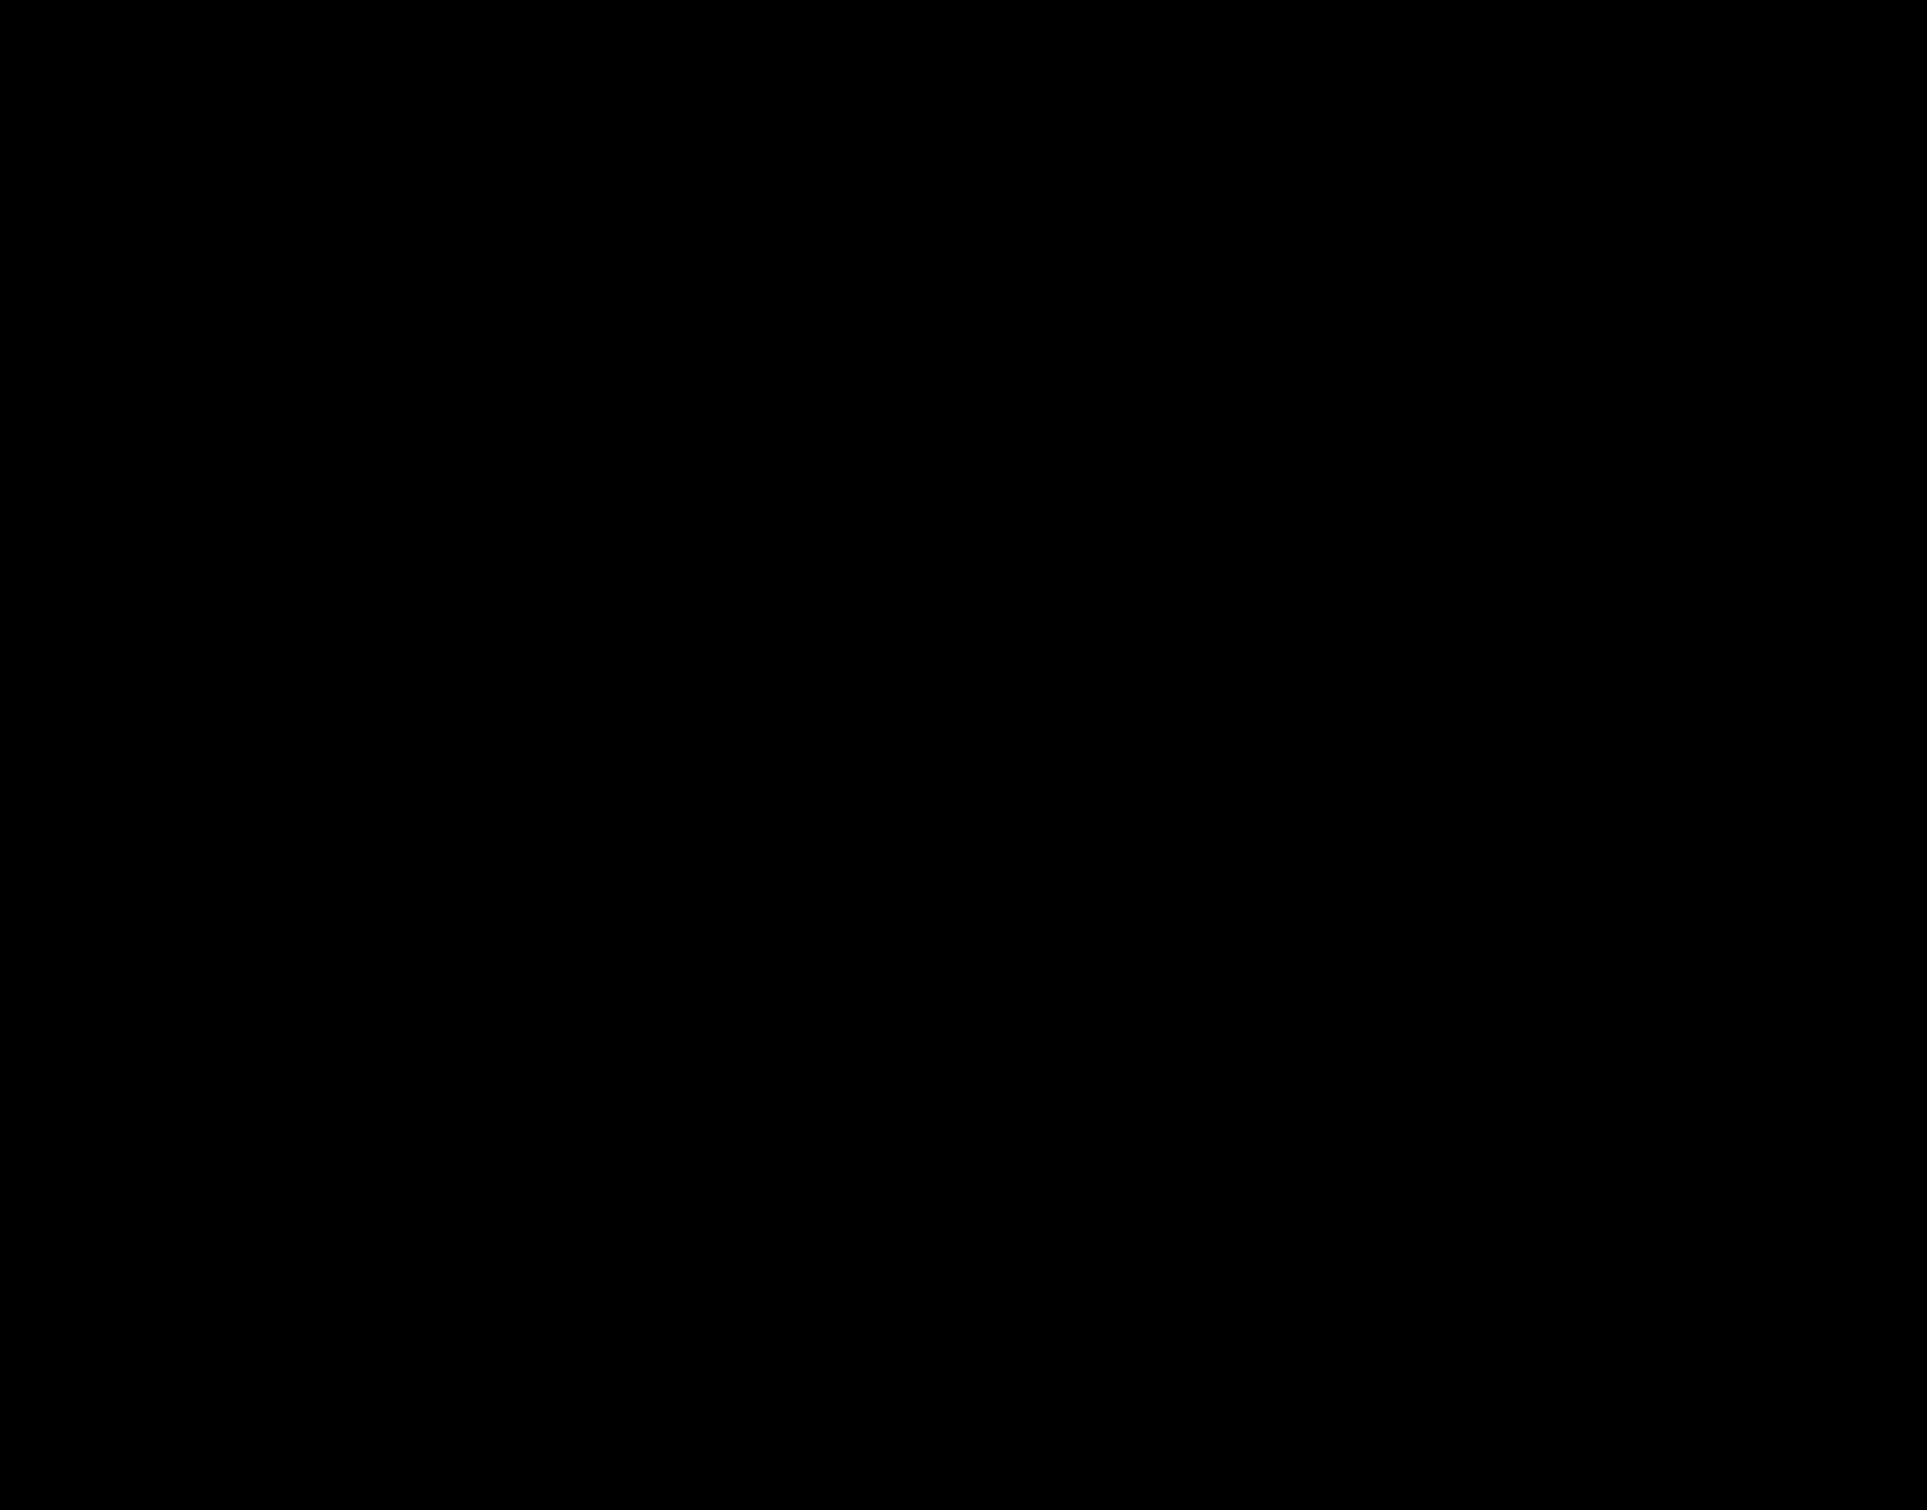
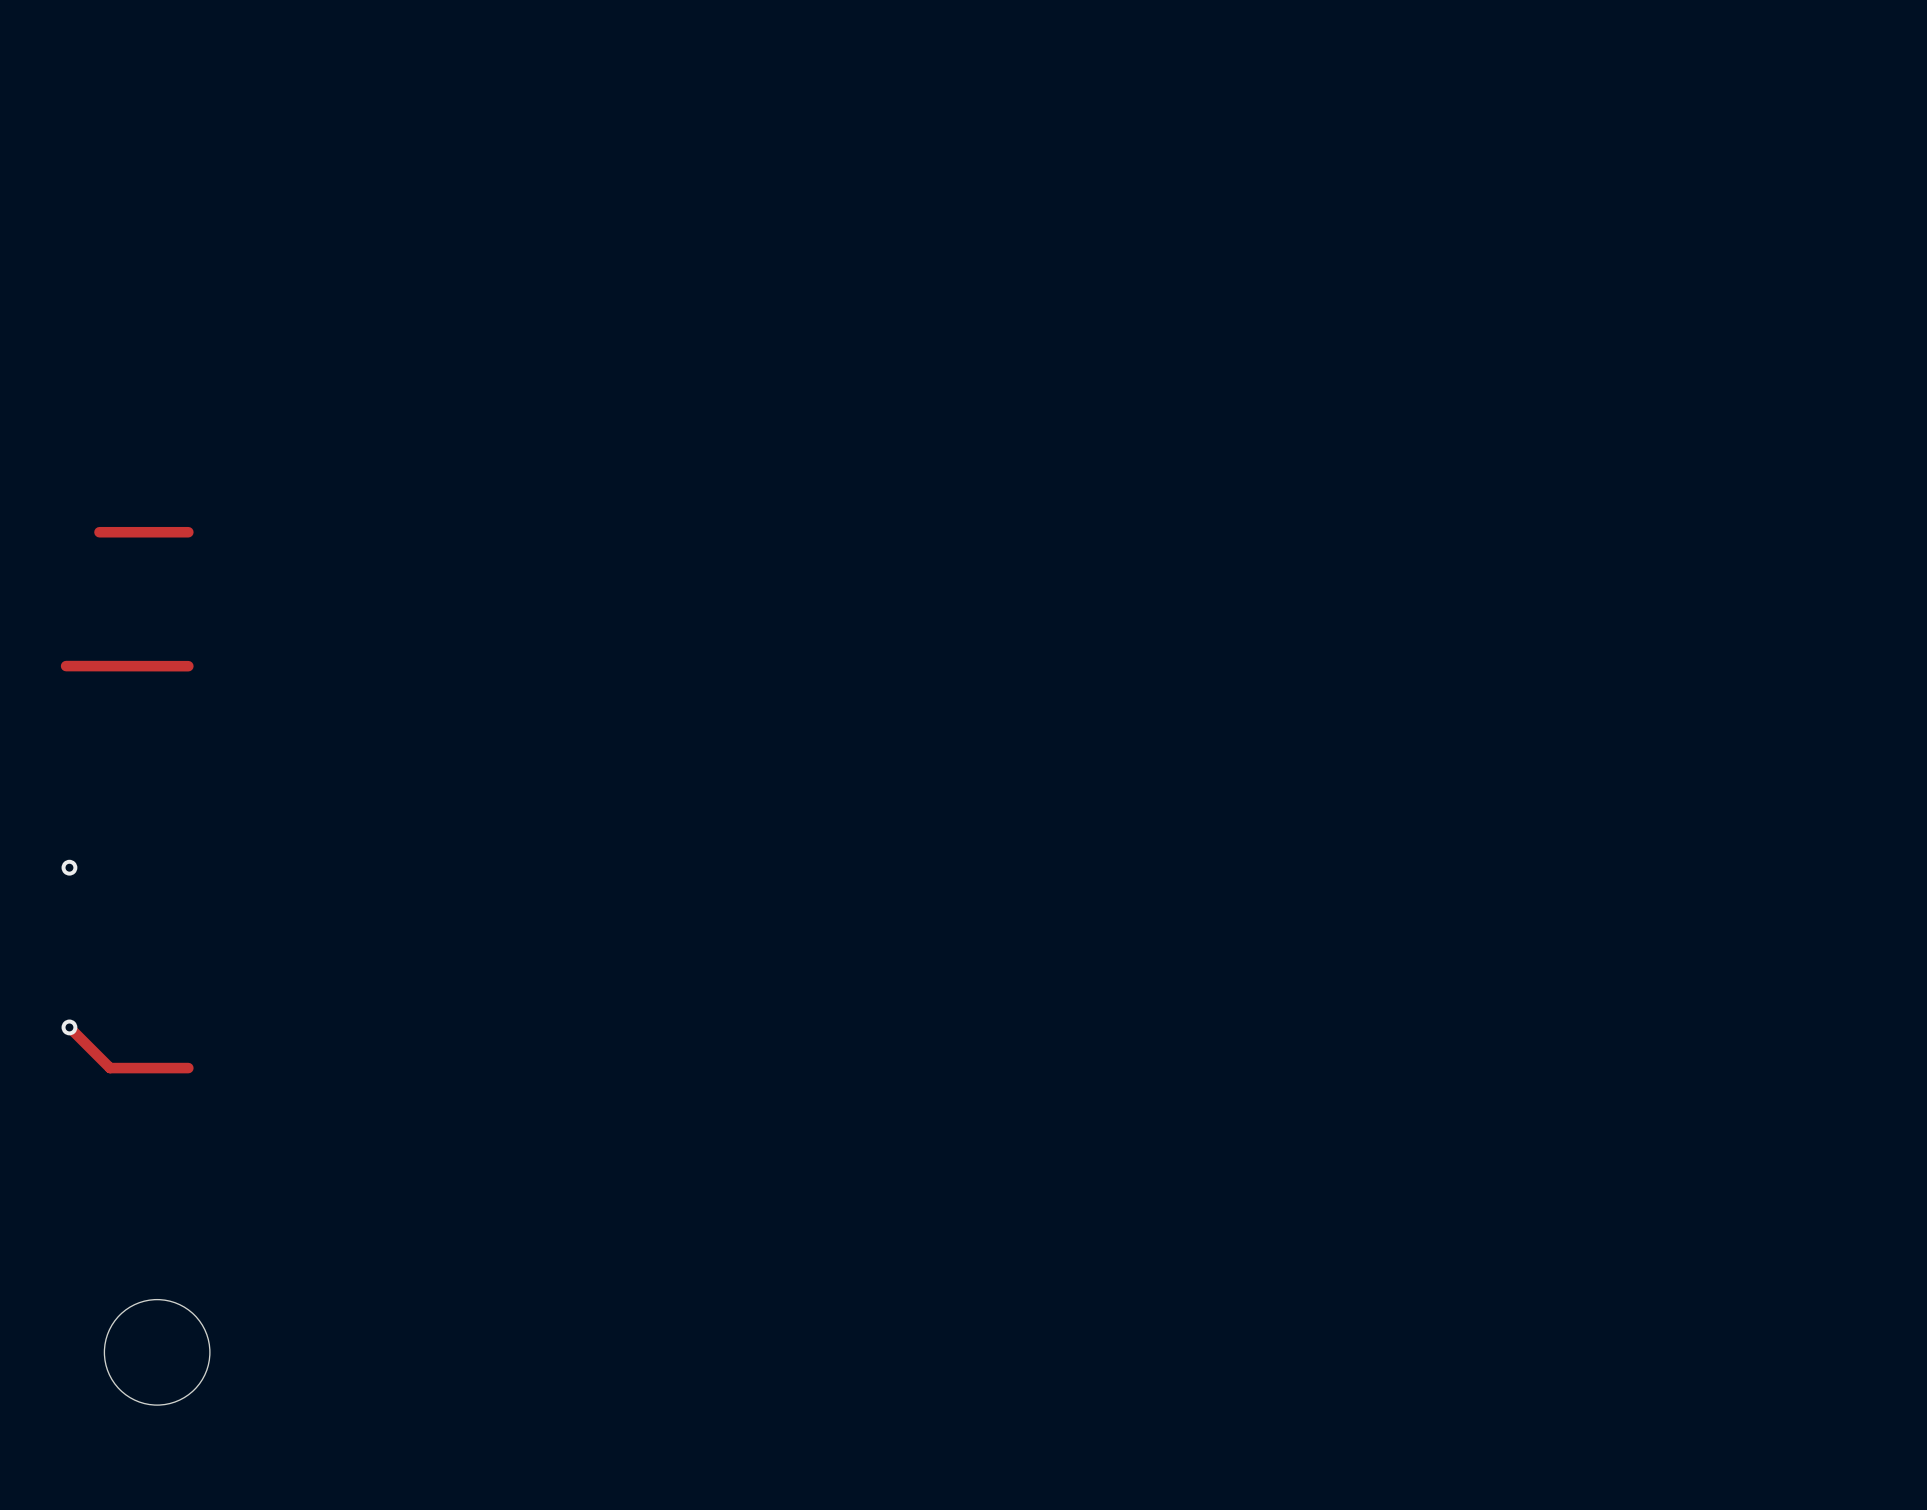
track: none -> (99, 532) (188, 532)
track: none -> (66, 666) (188, 666)
via: none -> (69, 867)
track: none -> (69, 1027) (110, 1068) (188, 1068)
via: none -> (69, 1027)
round board edge: none -> [103, 1298, 211, 1406]

